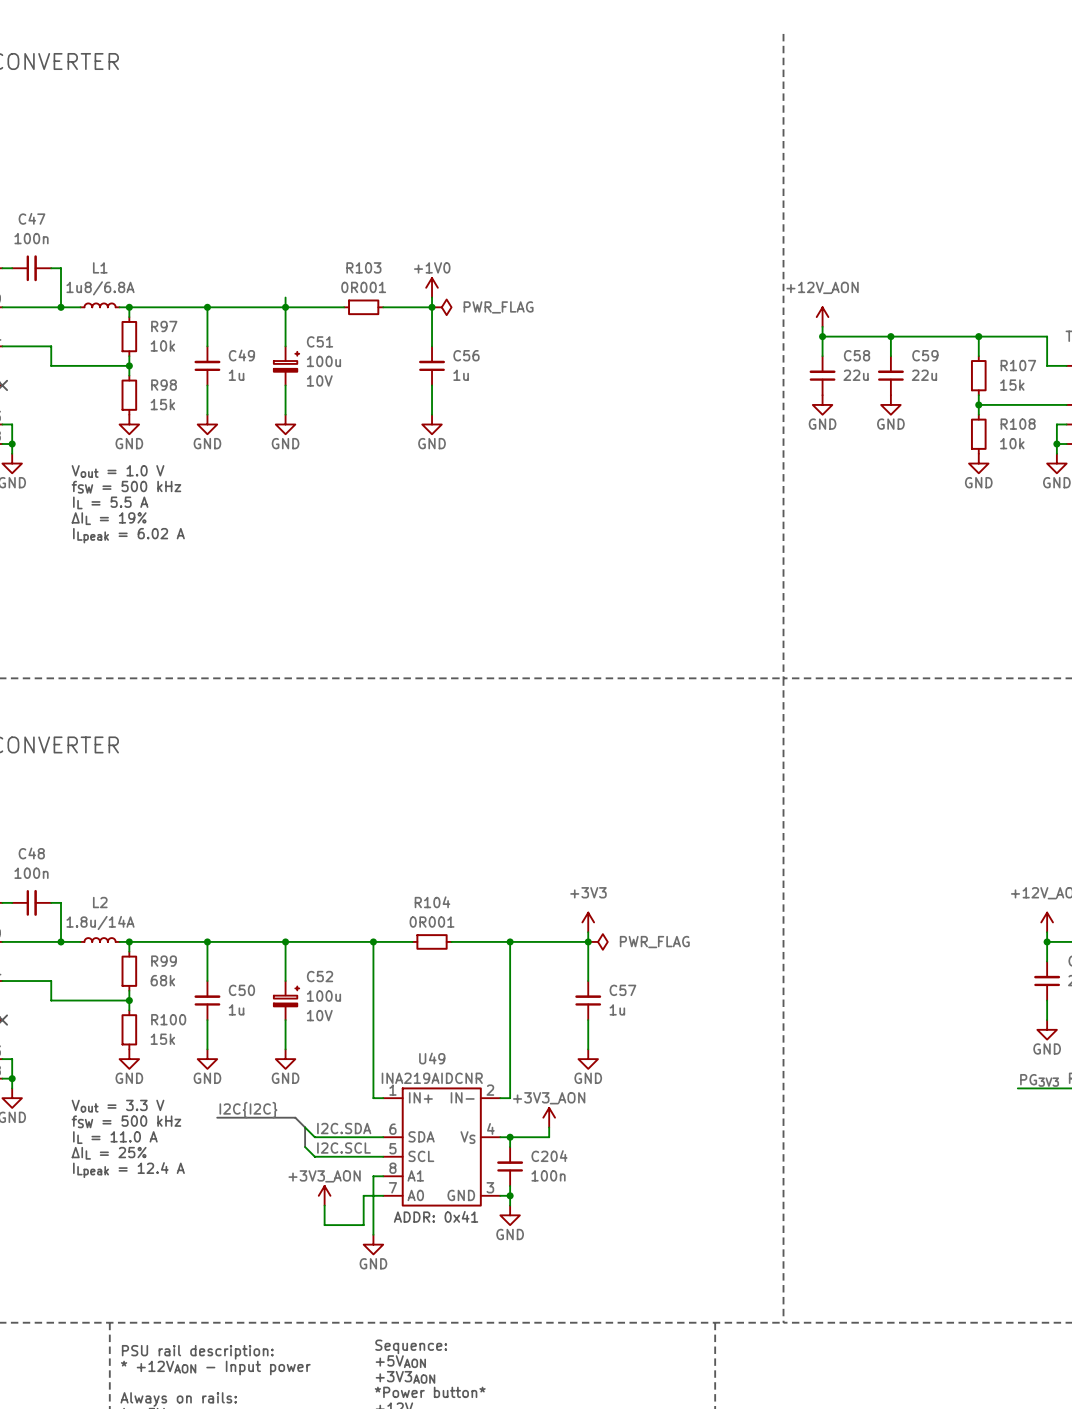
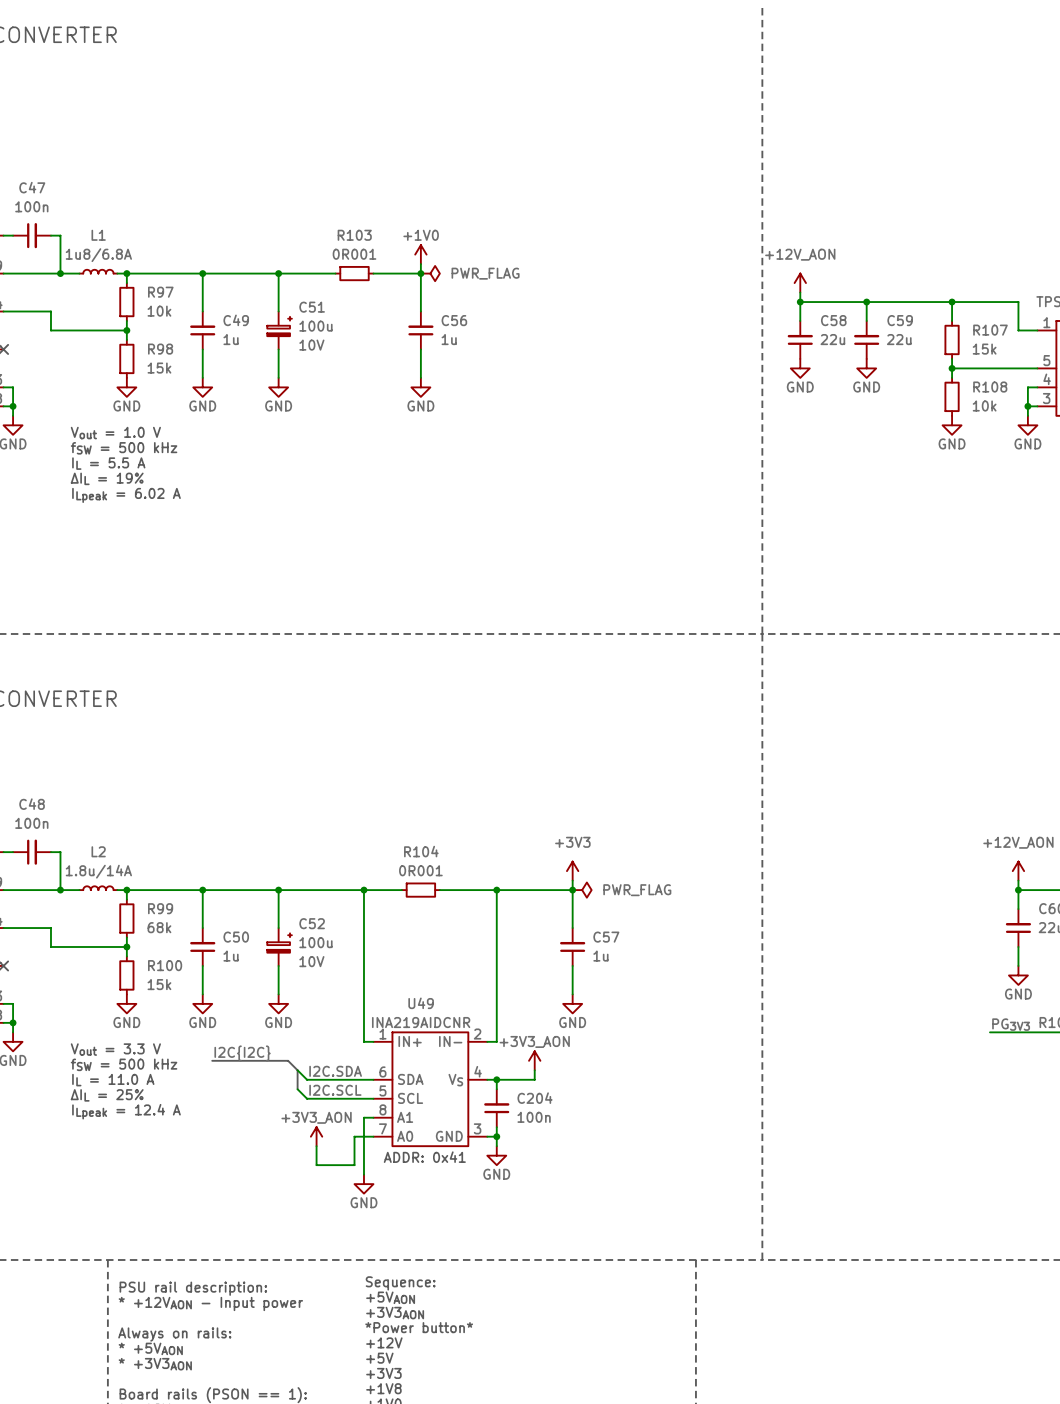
wire: (285, 297) (285, 307) -> none

